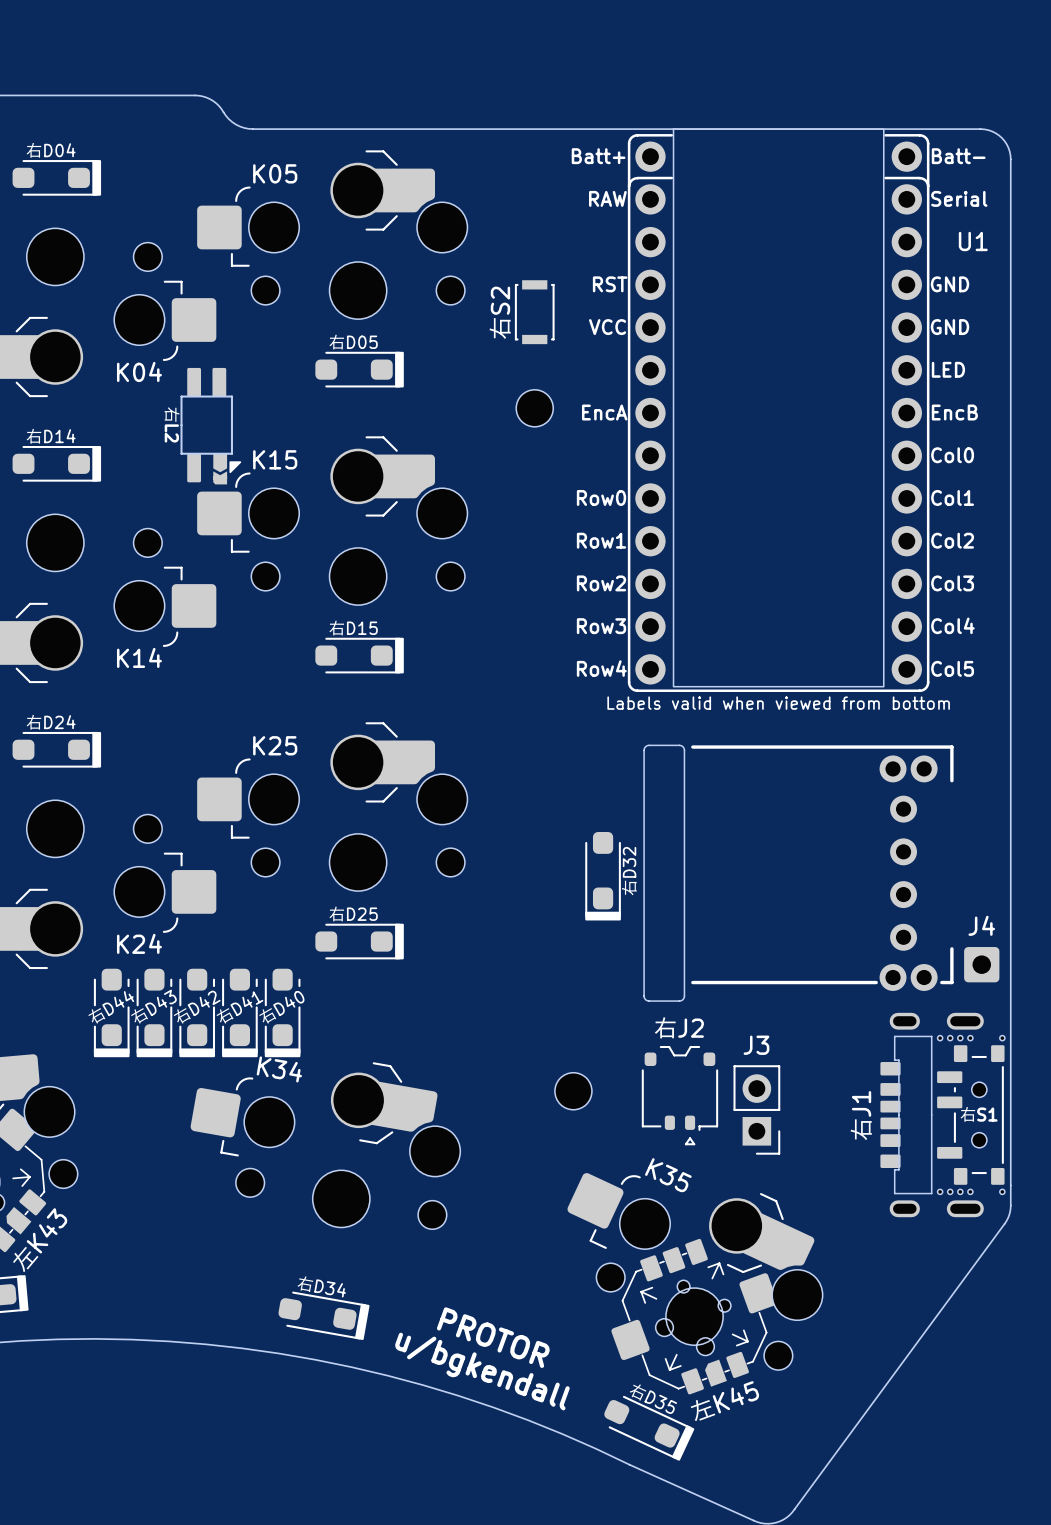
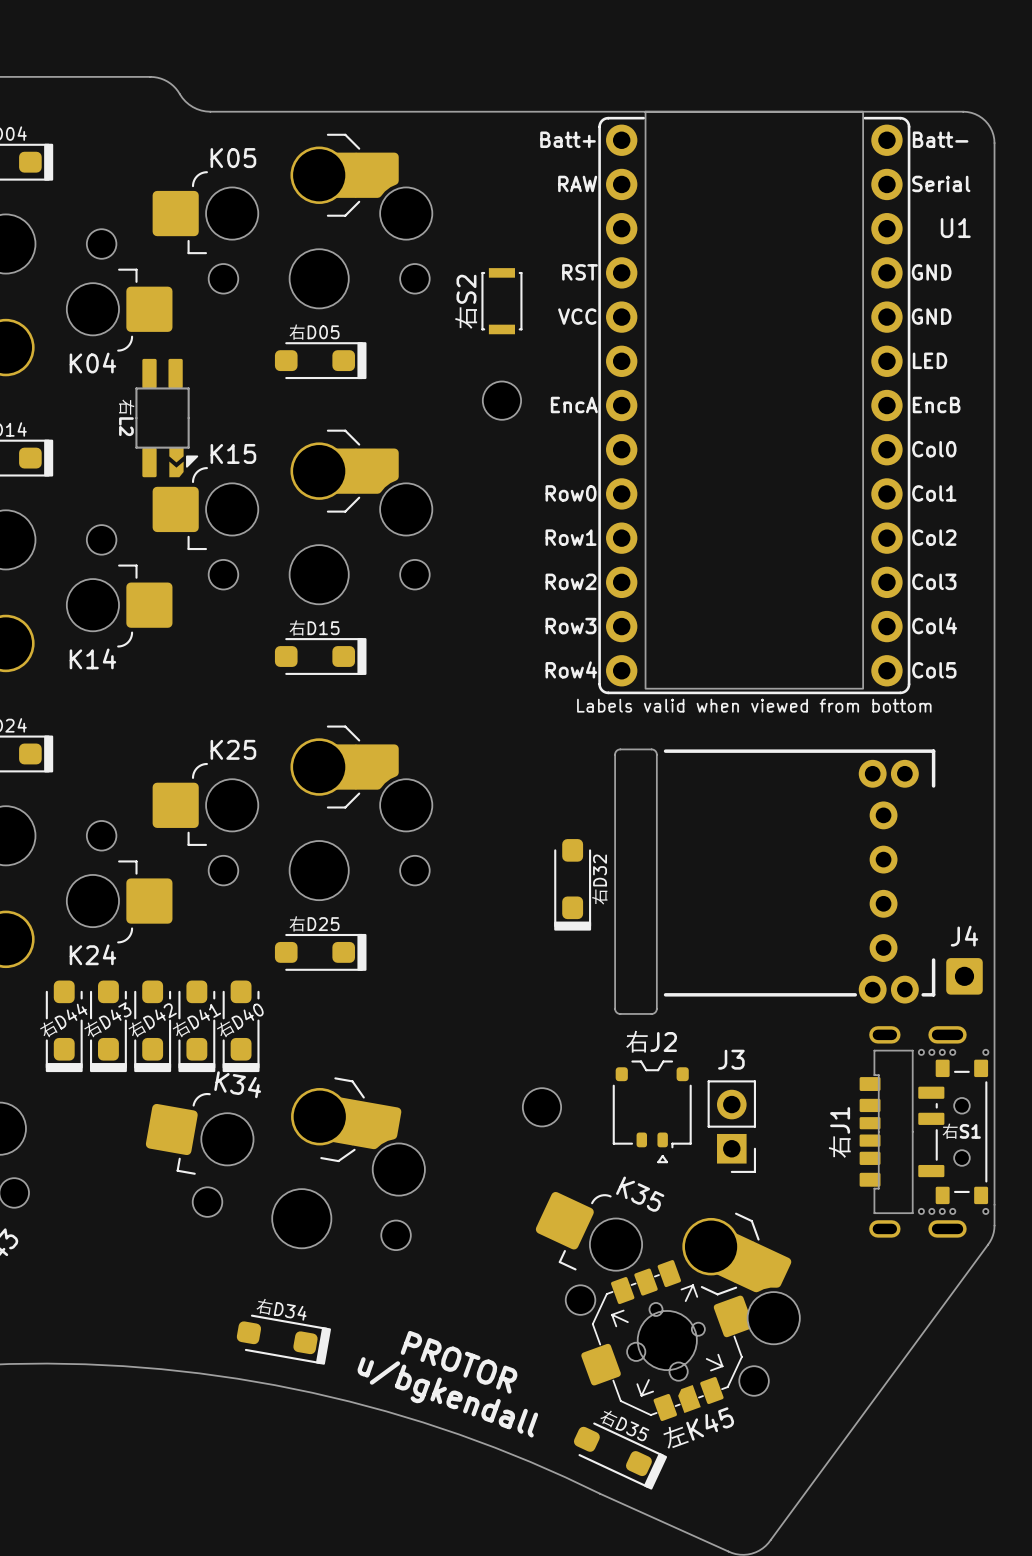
U1 footprint: [627, 128, 930, 693] -> [598, 111, 911, 695]
右L2 footprint: [180, 367, 242, 485] -> [135, 358, 199, 478]

